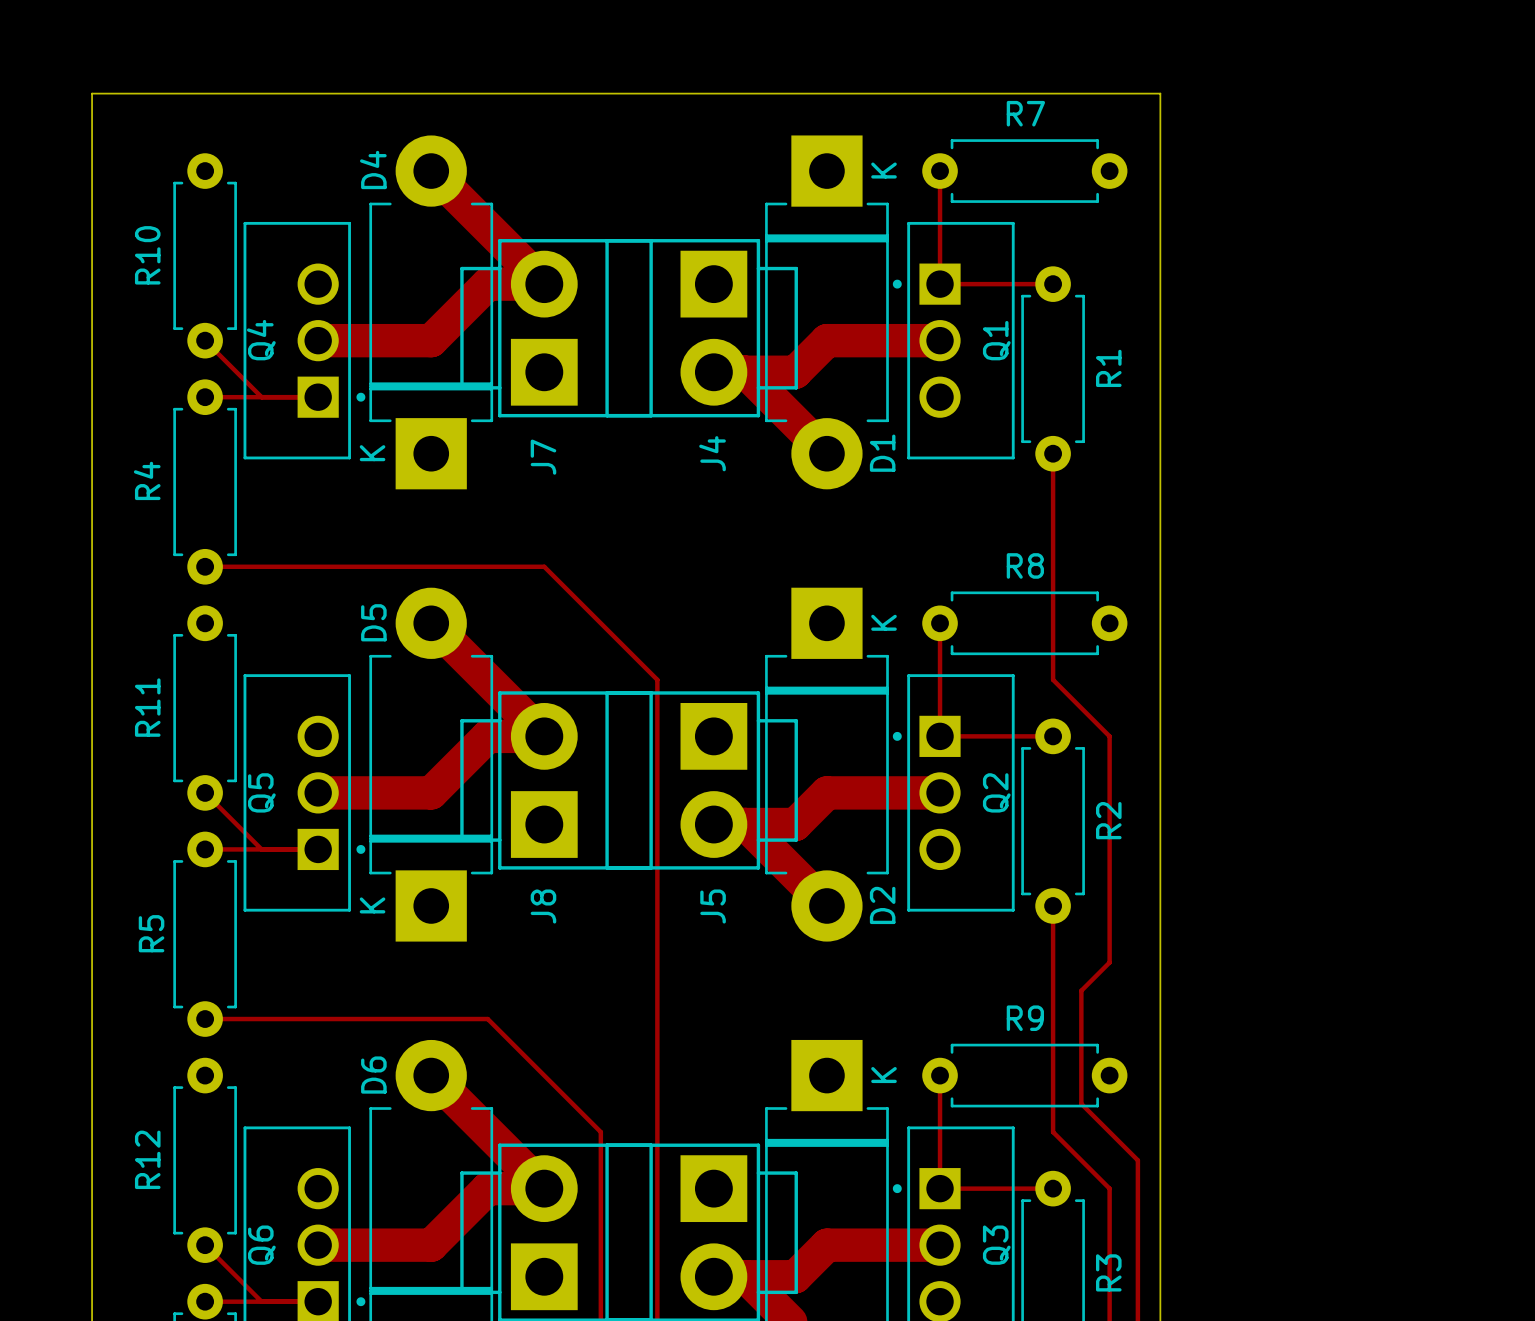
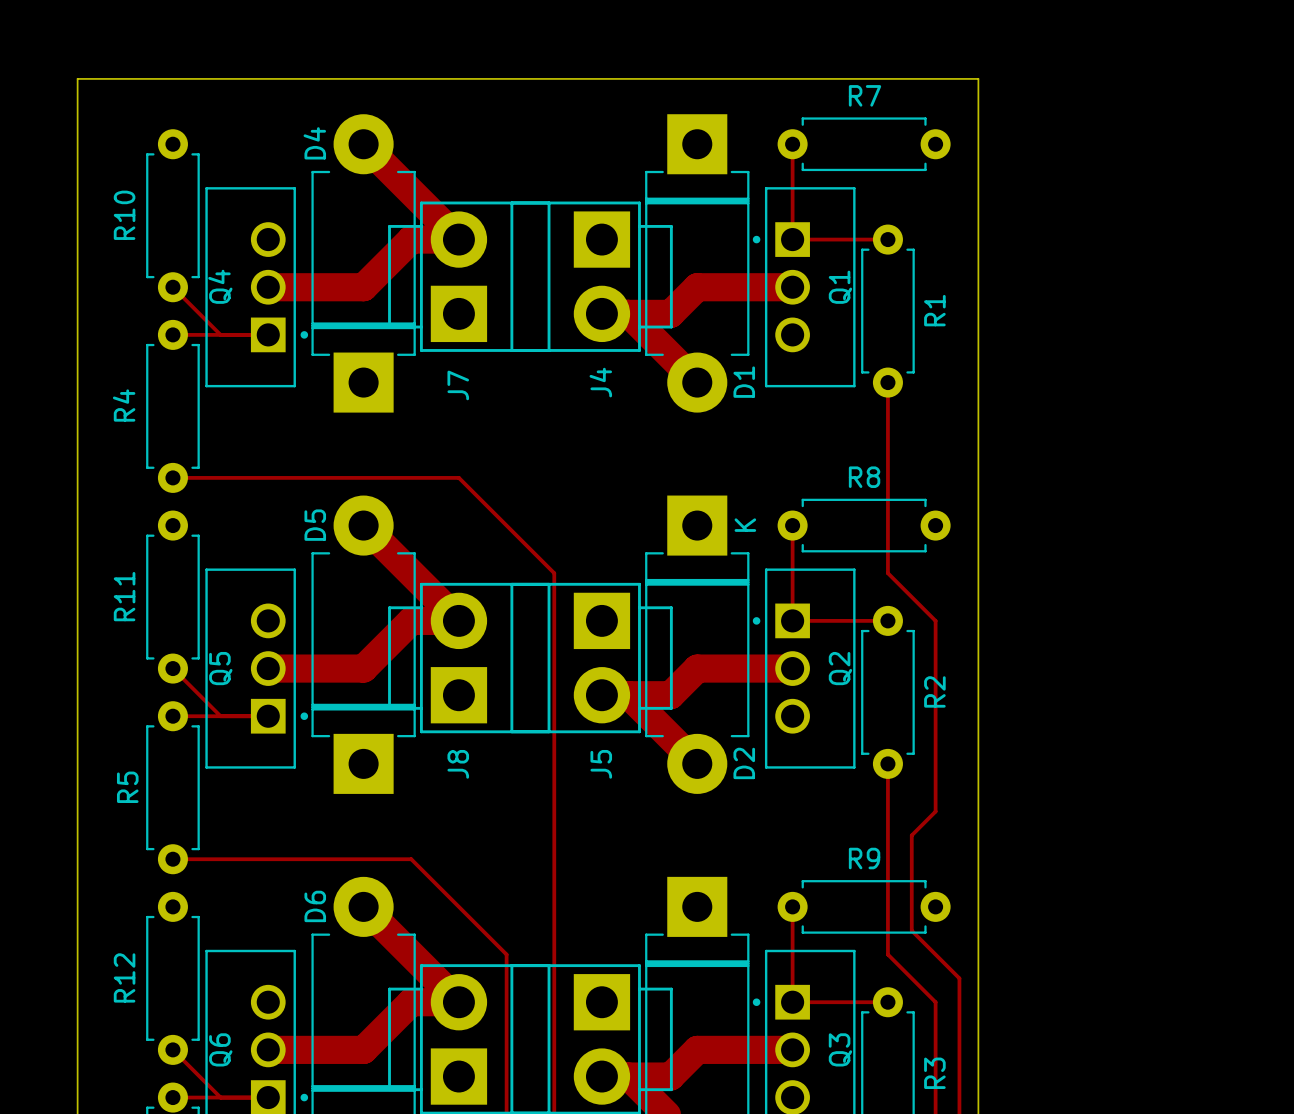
D1 text: K (884, 170) -> none
D4 text: K (372, 453) -> none
D5 text: K (372, 905) -> none
part text: K (884, 1075) -> none

